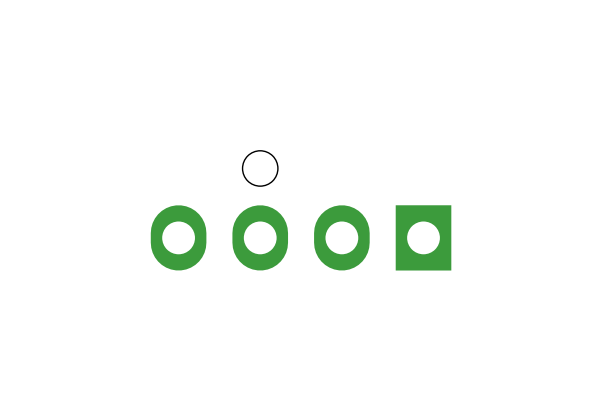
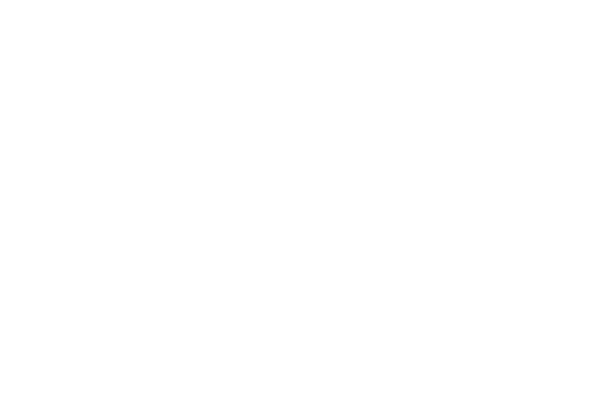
part: (301, 210) -> none

